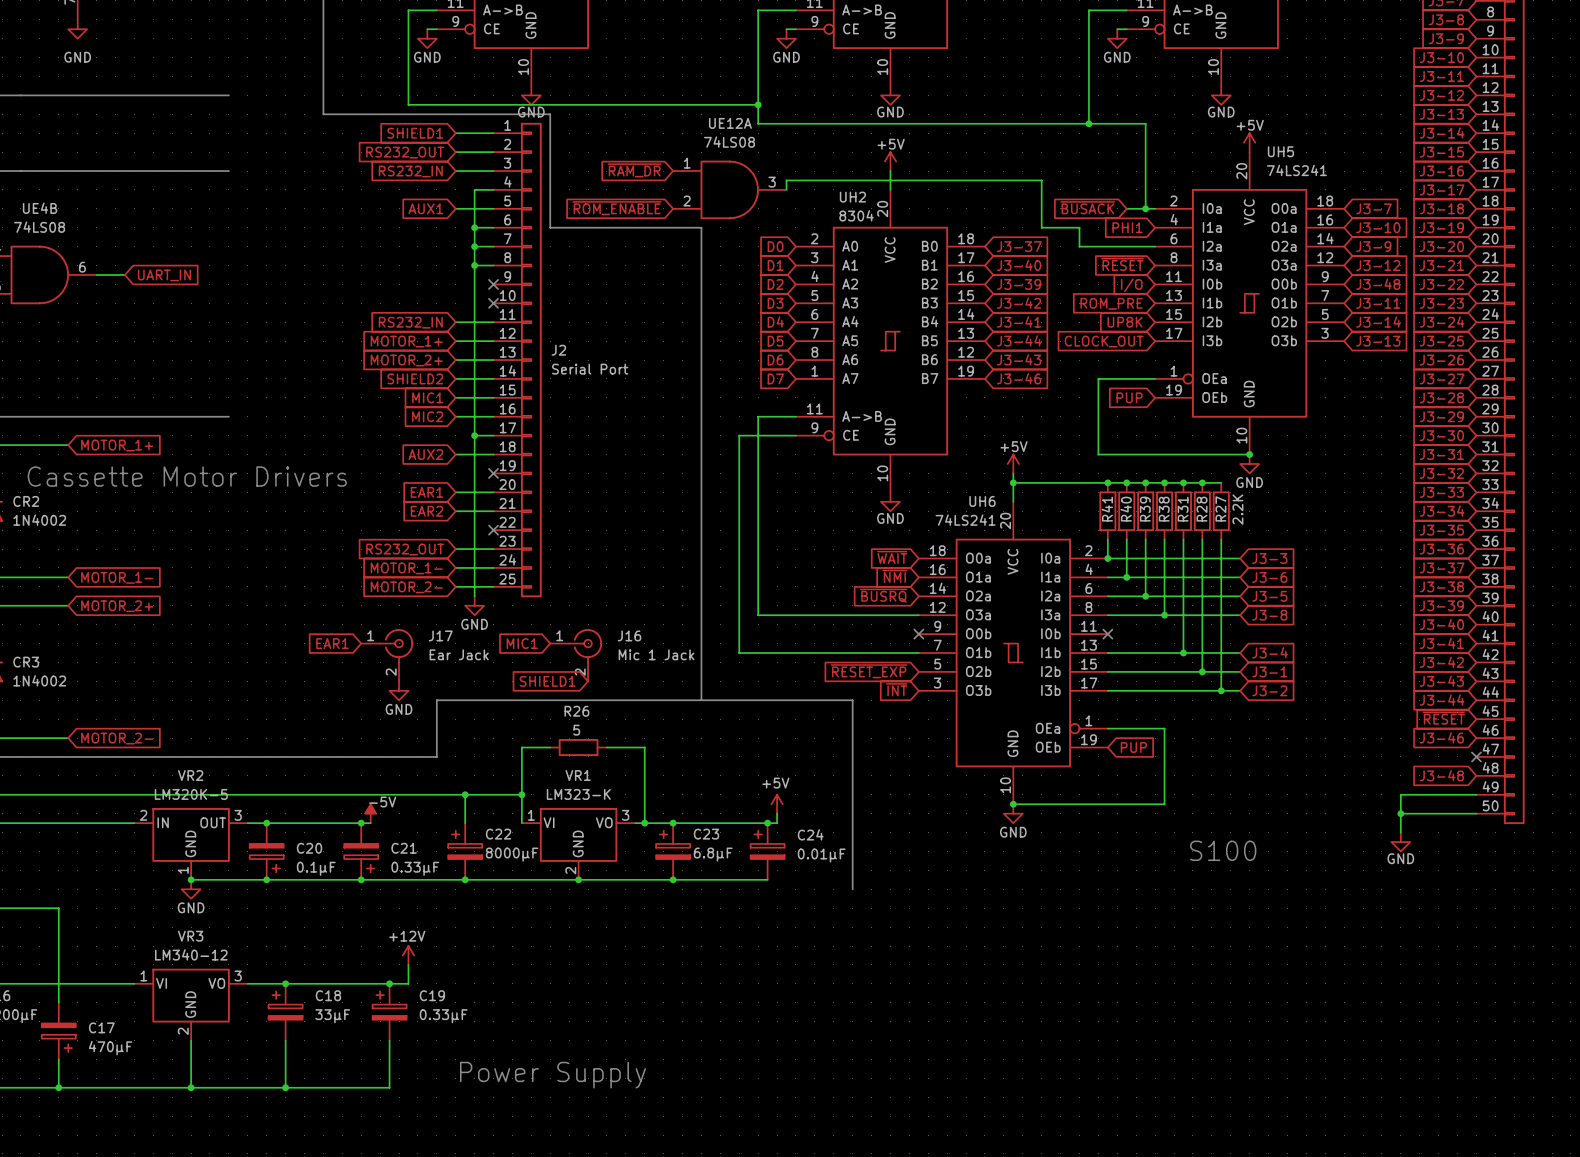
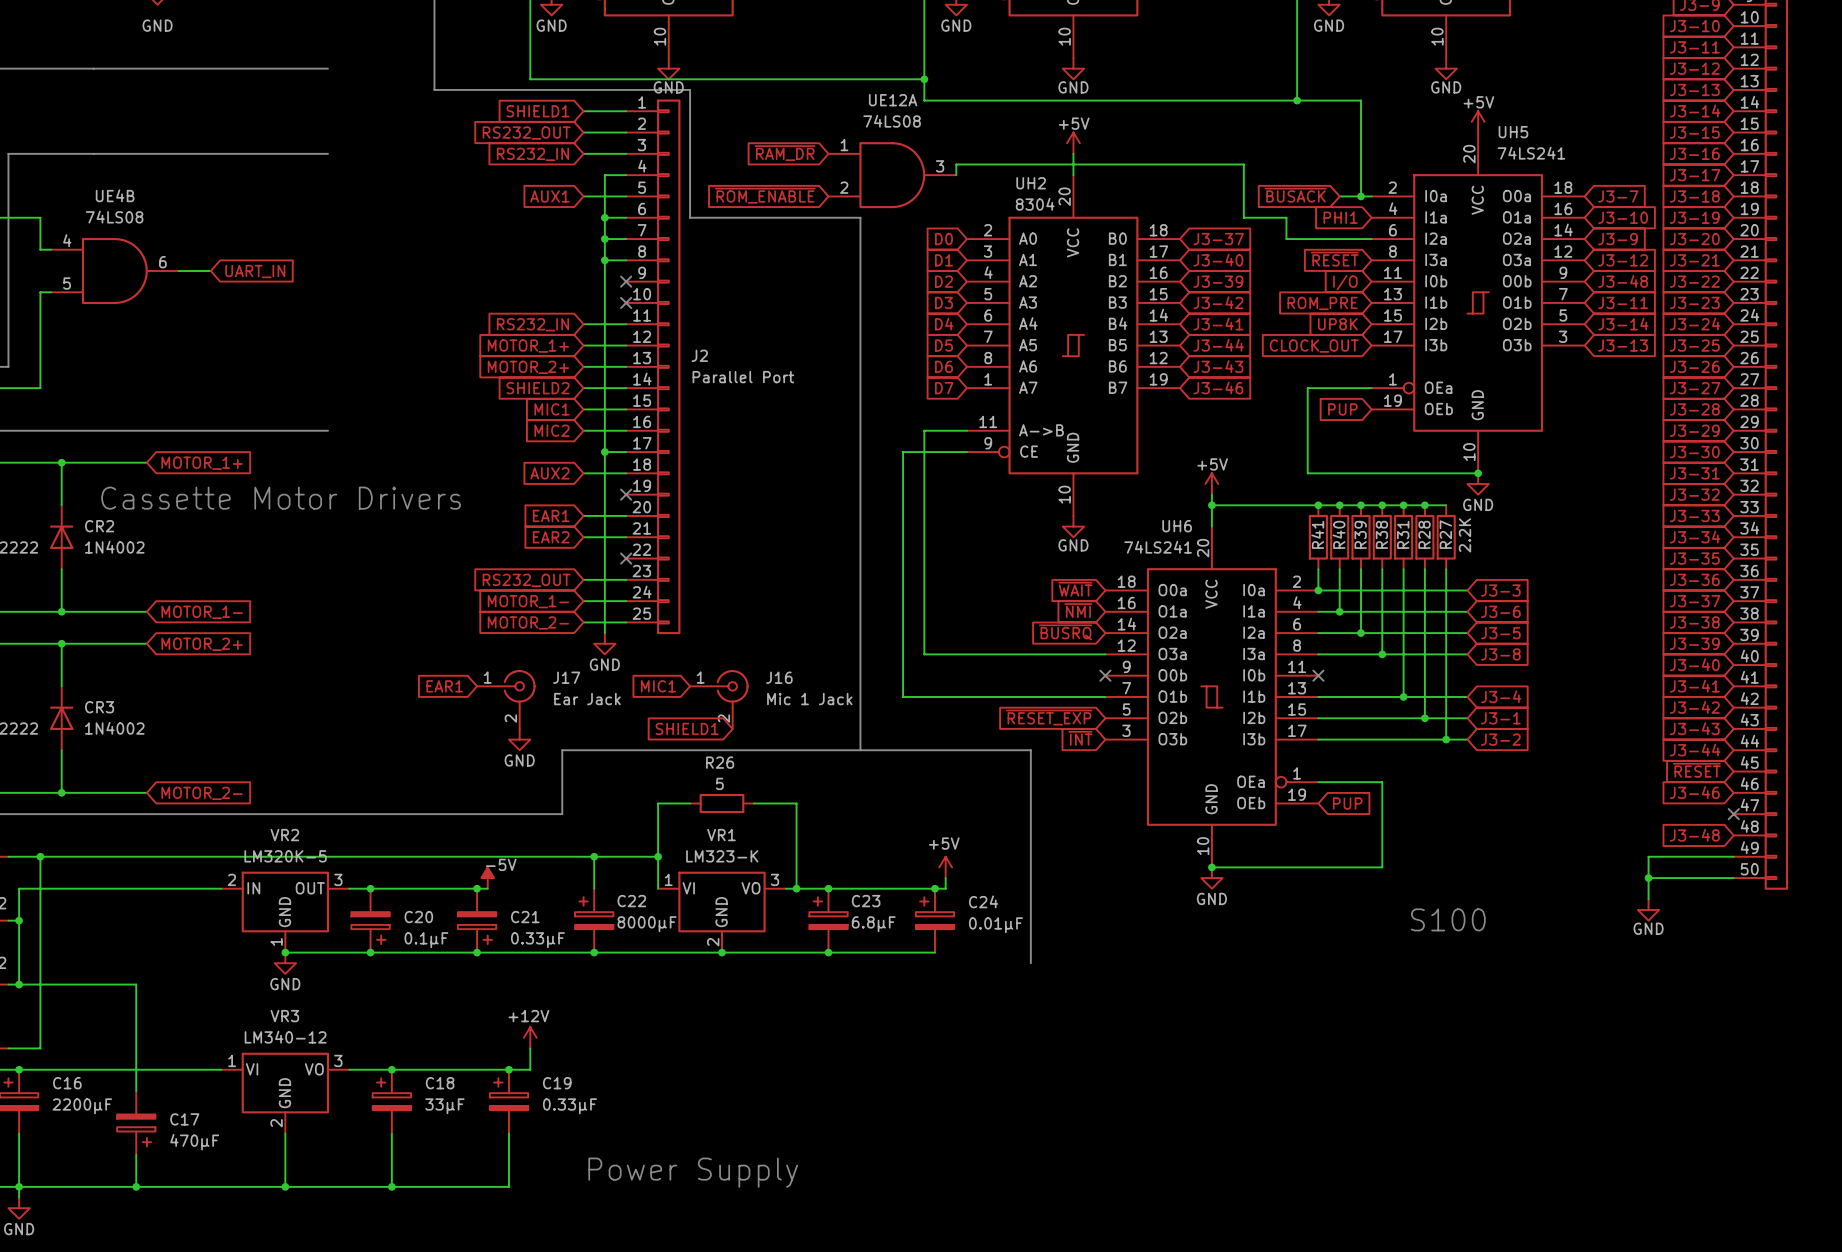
J2 value: Serial Port (590, 369) -> Parallel Port (743, 377)

